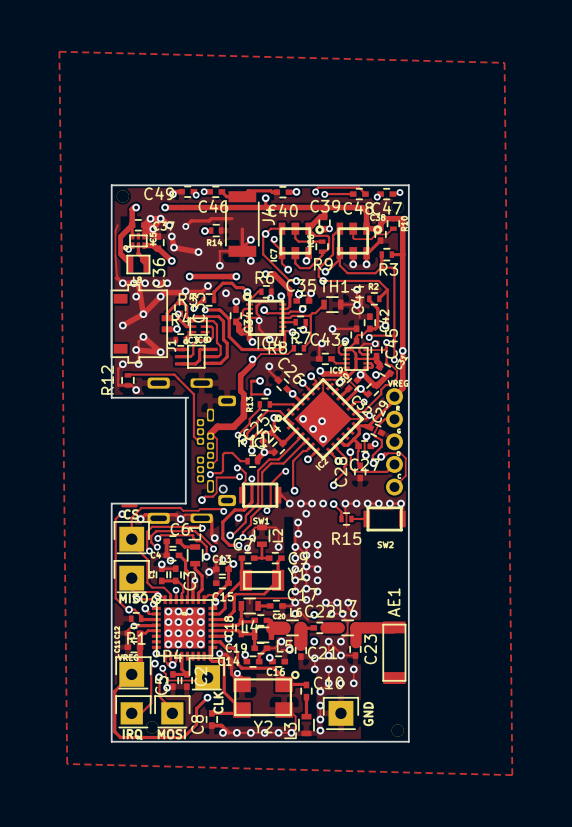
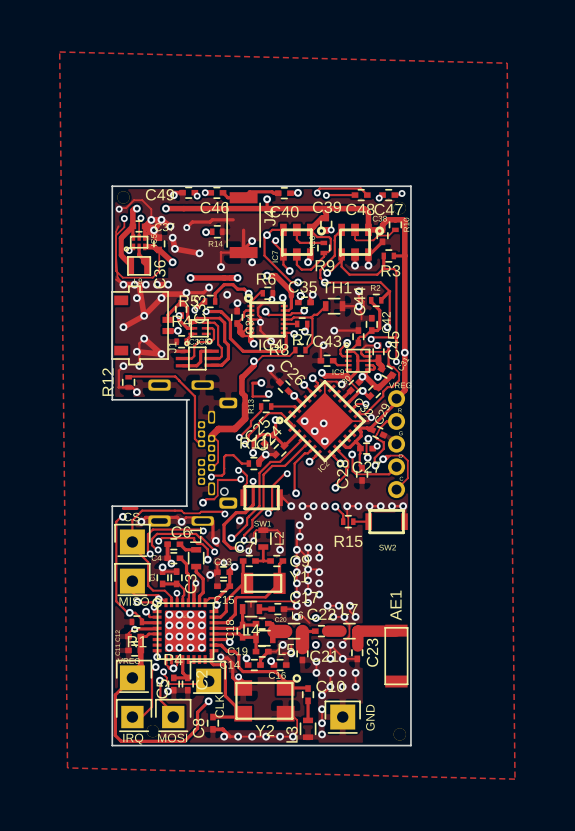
track: none -> (119, 209) (126, 208) (133, 200) (142, 200) (151, 209) (151, 219)
via: none -> (119, 209)
track: none -> (124, 218) (124, 227) (115, 235) (115, 270) (122, 277) (152, 277) (159, 271) (159, 250)
via: none -> (124, 218)
track: none -> (140, 218) (139, 219) (139, 237)
via: none -> (140, 218)

